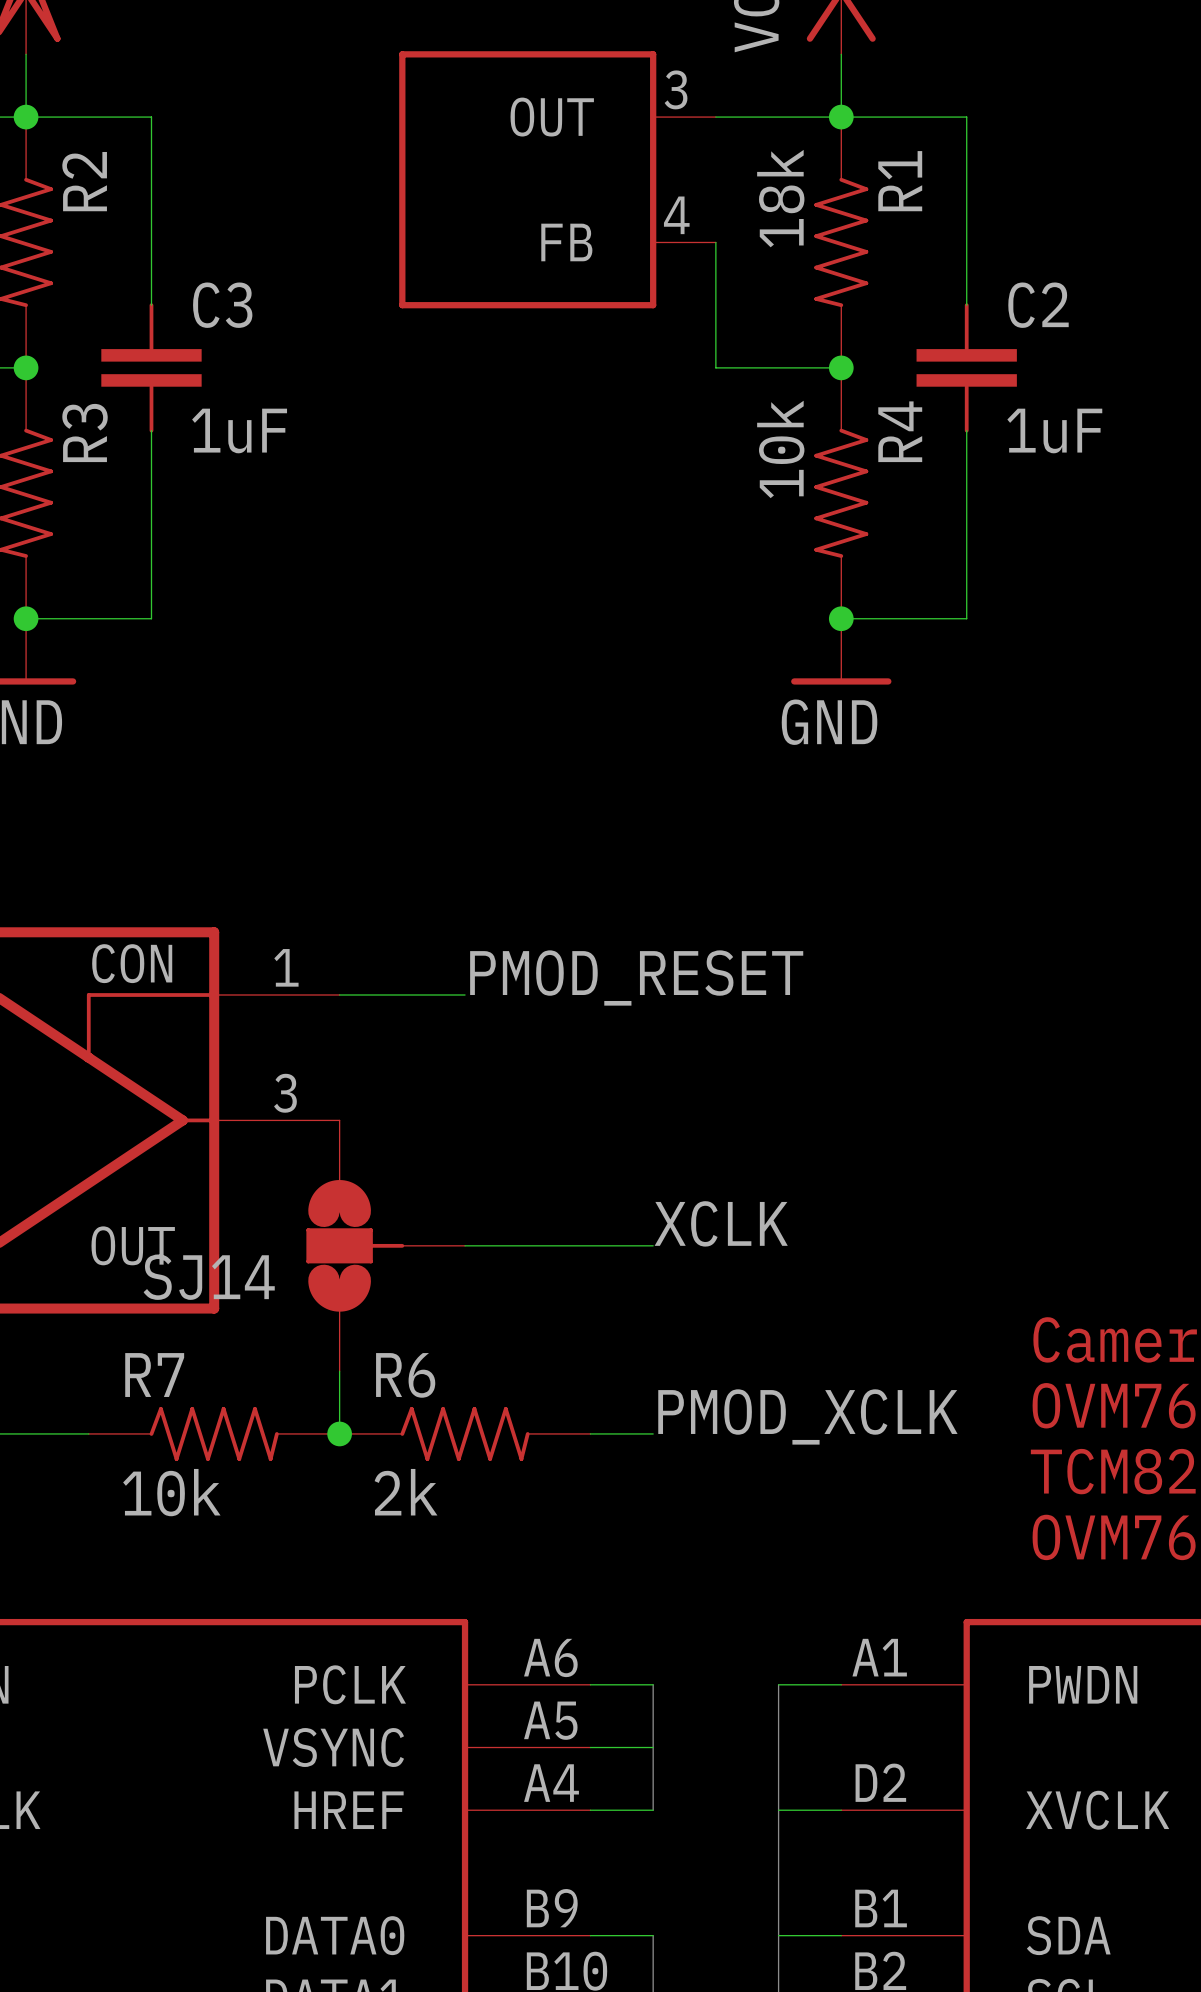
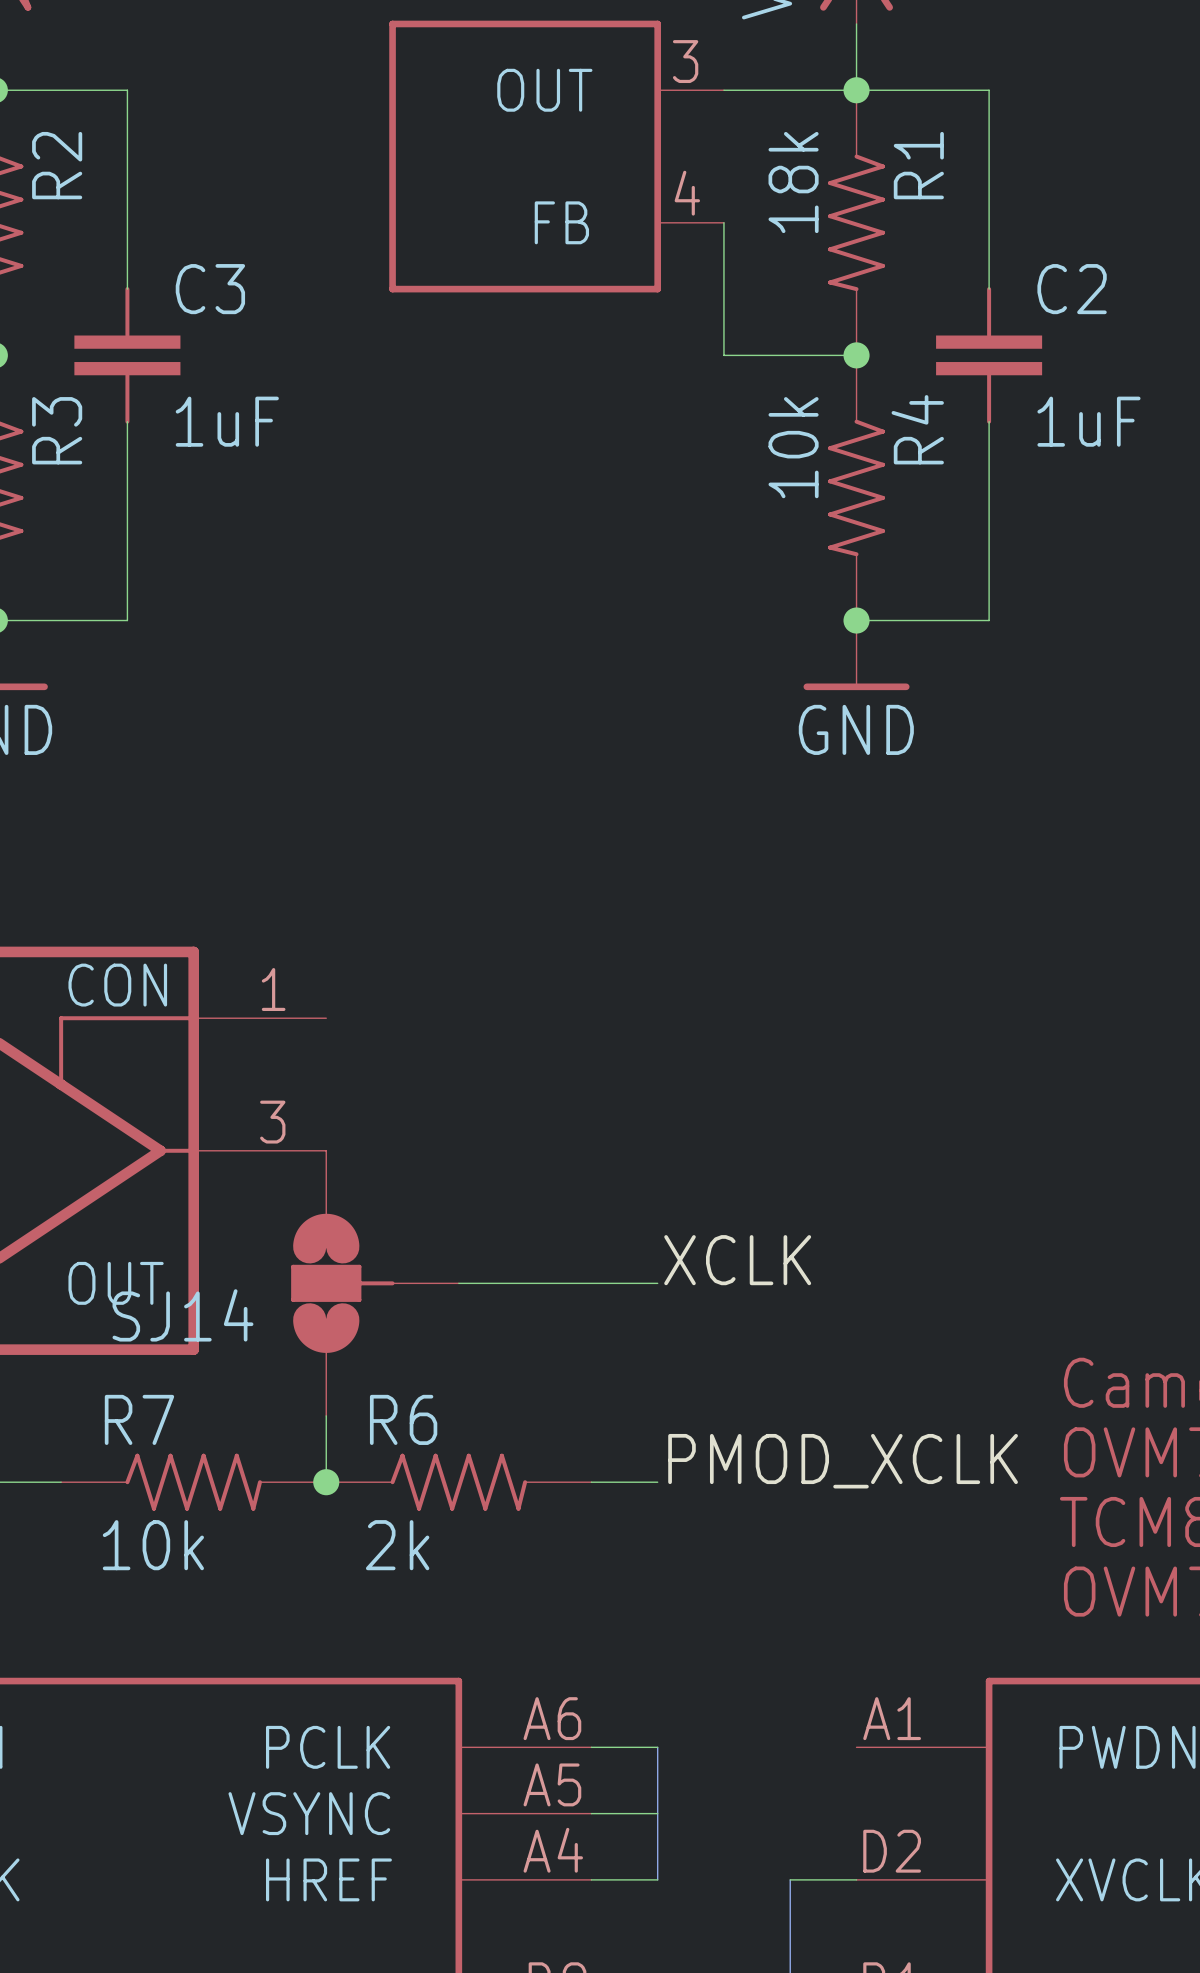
label: PMOD_RESET (636, 977) -> none
wire: (339, 995) (465, 995) -> none
bus: (778, 1684) (778, 1810) -> none
wire: (778, 1684) (841, 1684) -> none

